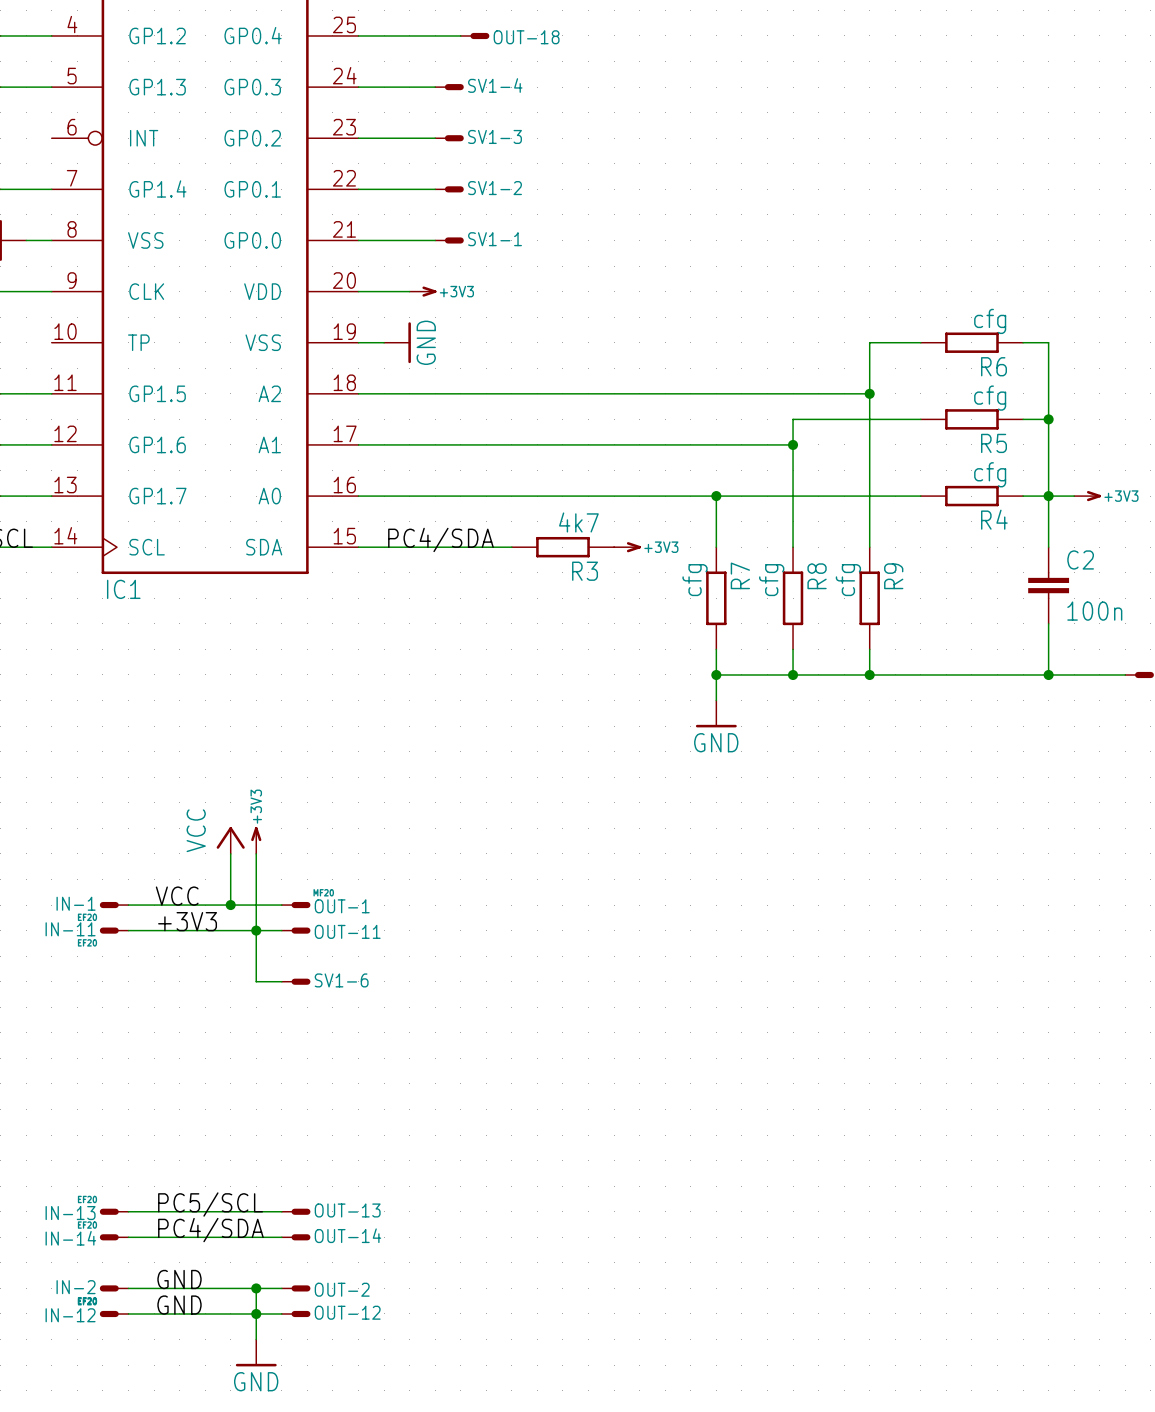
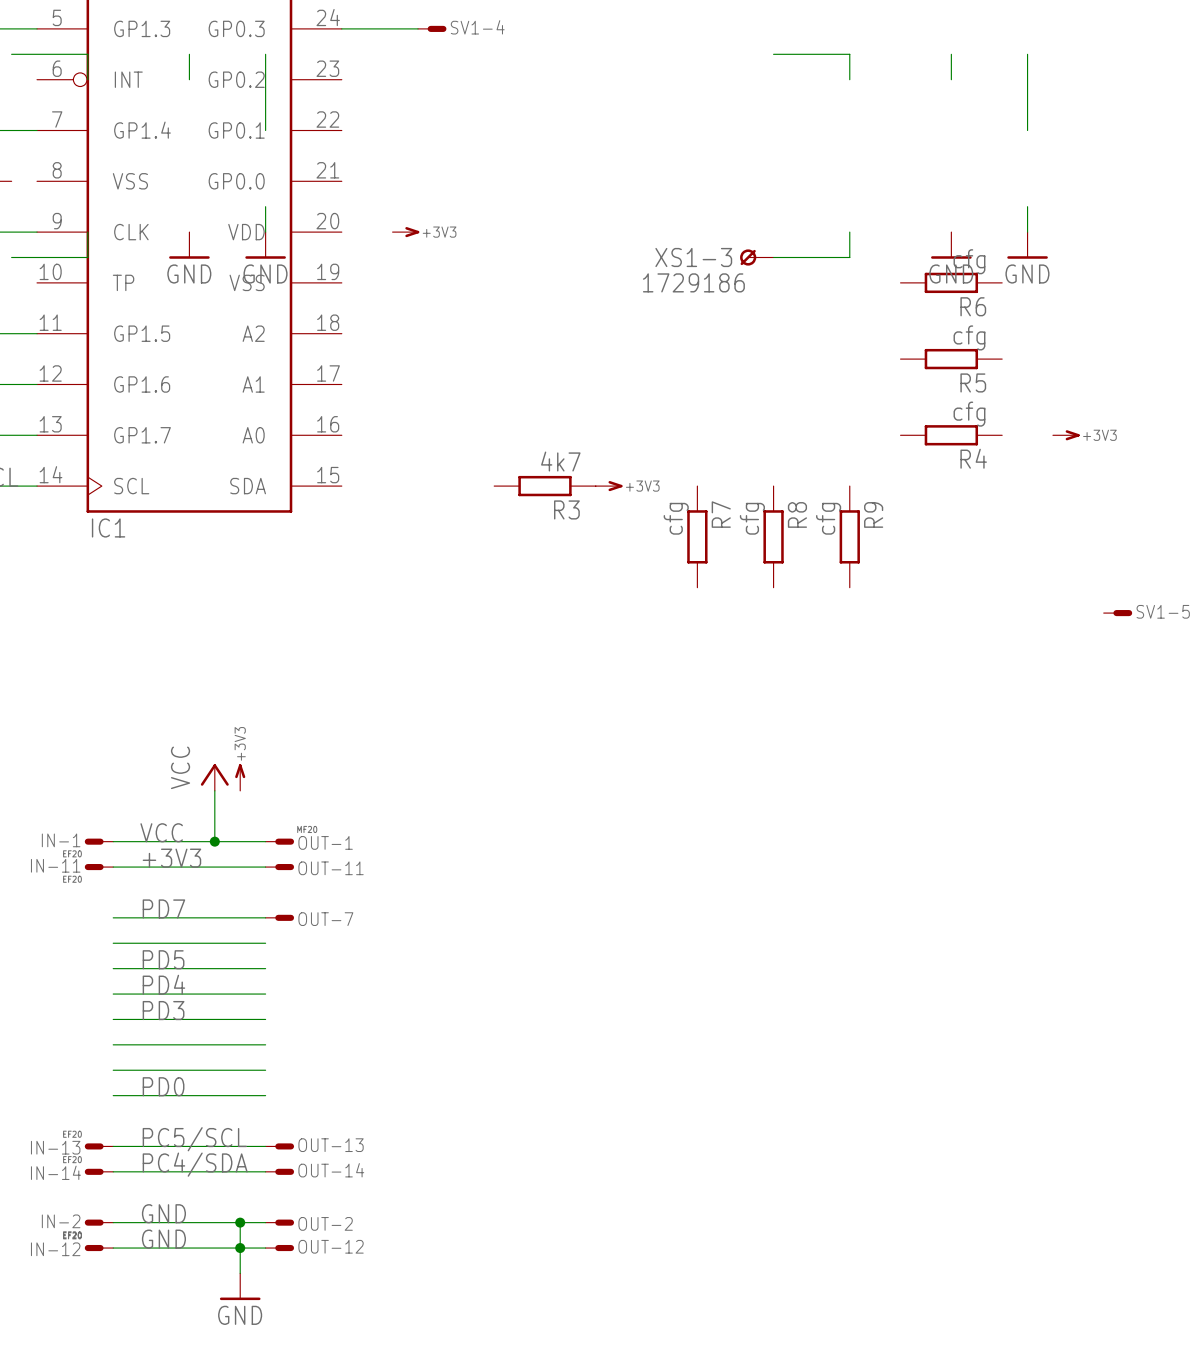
wire: none -> (11, 54) (87, 54) (87, 79)
wire: none -> (189, 54) (189, 79)
wire: none -> (265, 54) (265, 130)
wire: none -> (773, 54) (849, 54) (849, 79)
wire: none -> (951, 54) (951, 79)
wire: none -> (1027, 54) (1027, 130)
wire: (358, 138) (435, 138) -> none
SV1-3: (449, 138) -> none
wire: (358, 189) (435, 189) -> none
SV1-2: (449, 189) -> none
wire: (26, 240) (51, 240) -> none
wire: (358, 240) (435, 240) -> none
SV1-1: (449, 240) -> none
wire: none -> (265, 206) (265, 232)
wire: none -> (1027, 206) (1027, 232)
wire: none -> (87, 232) (87, 257) (11, 257)
wire: (358, 291) (409, 291) -> none
wire: none -> (849, 232) (849, 257) (773, 257)
power symbol: none -> GND (189, 245)
power symbol: none -> GND (265, 245)
power symbol: none -> GND (951, 245)
power symbol: none -> GND (1027, 245)
XS1-3: none -> 1729186 (756, 257)
wire: (358, 342) (384, 342) -> none
power symbol: GND (397, 342) -> none
wire: (920, 342) (869, 342) (869, 547) -> none
wire: (1023, 342) (1048, 342) (1048, 547) -> none
wire: (358, 393) (869, 393) -> none
junction: (869, 393) -> none
wire: (920, 419) (793, 419) (793, 547) -> none
wire: (1023, 419) (1048, 419) -> none
junction: (1048, 419) -> none
wire: (358, 444) (793, 444) -> none
junction: (793, 444) -> none
wire: (358, 496) (920, 496) -> none
wire: (716, 496) (716, 547) -> none
junction: (716, 496) -> none
wire: (1023, 496) (1074, 496) -> none
junction: (1048, 496) -> none
label: PC4/SDA (440, 539) -> none
wire: (358, 547) (511, 547) -> none
C2: 100n (1048, 585) -> none
wire: (1048, 623) (1048, 674) -> none
wire: (716, 649) (716, 700) -> none
wire: (793, 649) (793, 674) -> none
wire: (869, 649) (869, 674) -> none
wire: (716, 674) (1125, 674) -> none
junction: (716, 674) -> none
junction: (793, 674) -> none
junction: (869, 674) -> none
junction: (1048, 674) -> none
power symbol: GND (716, 713) -> none
wire: (256, 853) (256, 981) -> (113, 917) (240, 917)
junction: (256, 930) -> none
label: none -> PD7 (163, 908)
SV1-6 name: SV1-6 (341, 980) -> OUT-7 (325, 919)
wire: none -> (113, 943) (265, 943)
label: none -> PD5 (163, 959)
wire: none -> (113, 968) (265, 968)
label: none -> PD4 (163, 984)
wire: none -> (113, 994) (265, 994)
label: none -> PD3 (163, 1010)
wire: none -> (113, 1019) (265, 1019)
wire: none -> (113, 1044) (265, 1044)
wire: none -> (113, 1070) (265, 1070)
label: none -> PD0 (163, 1086)
wire: none -> (113, 1095) (265, 1095)

